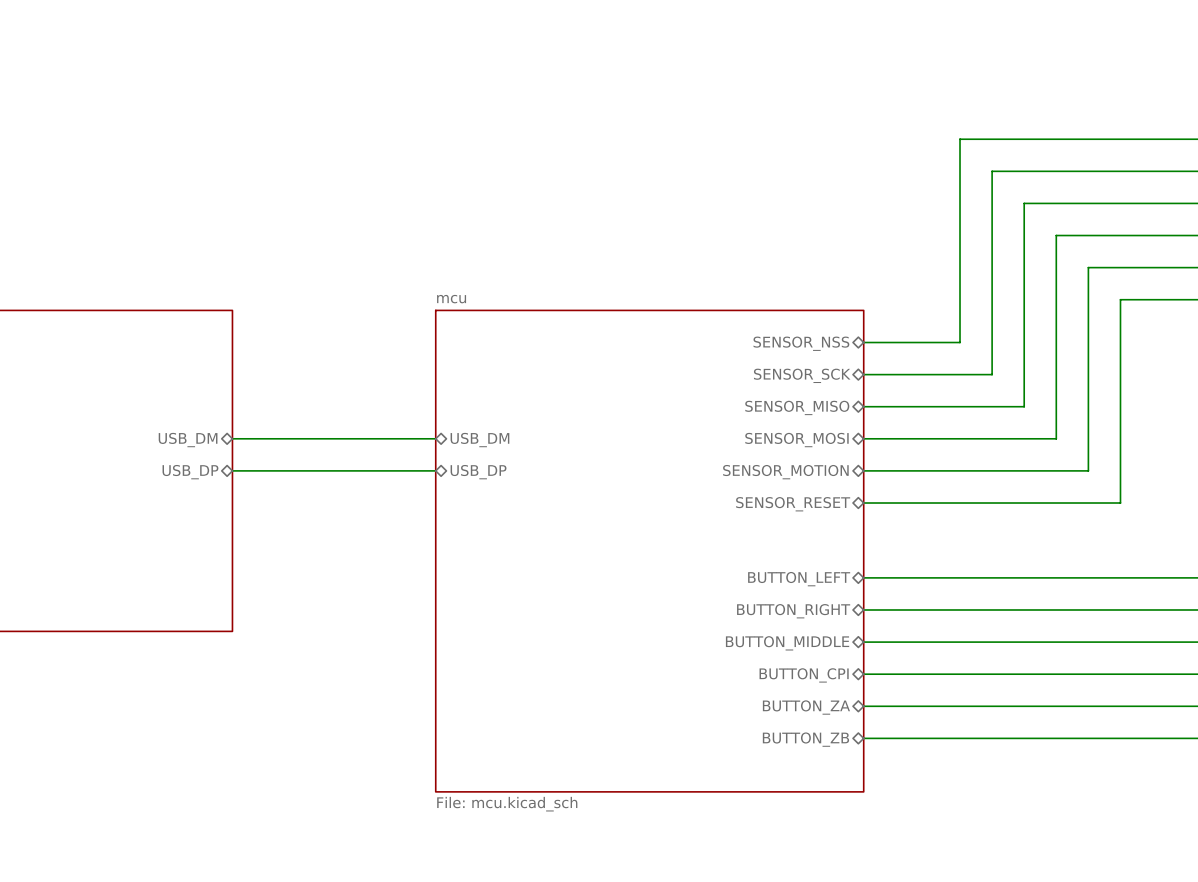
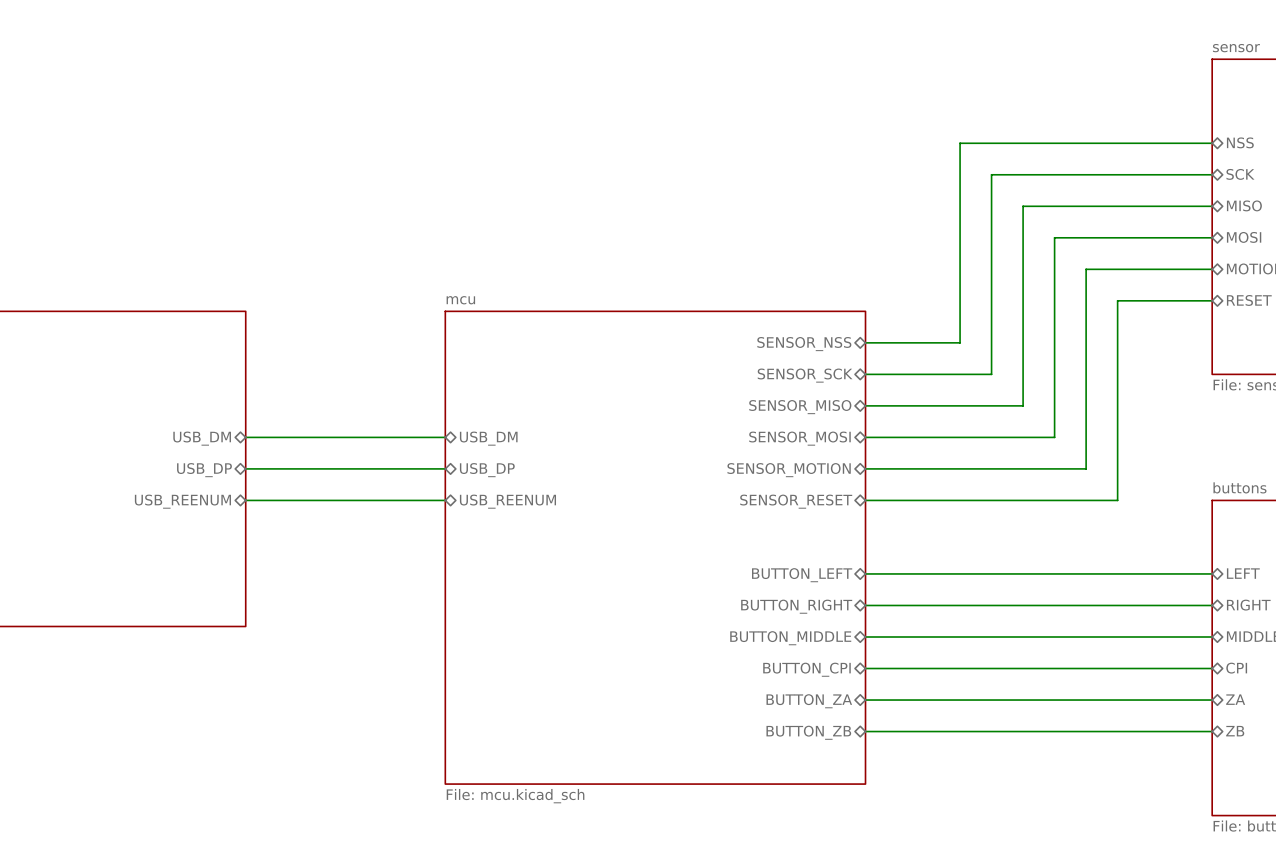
wire: none -> (245, 500) (445, 500)
sheet pin: none -> USB_REENUM (182, 501)
sheet pin: none -> USB_REENUM (507, 501)

